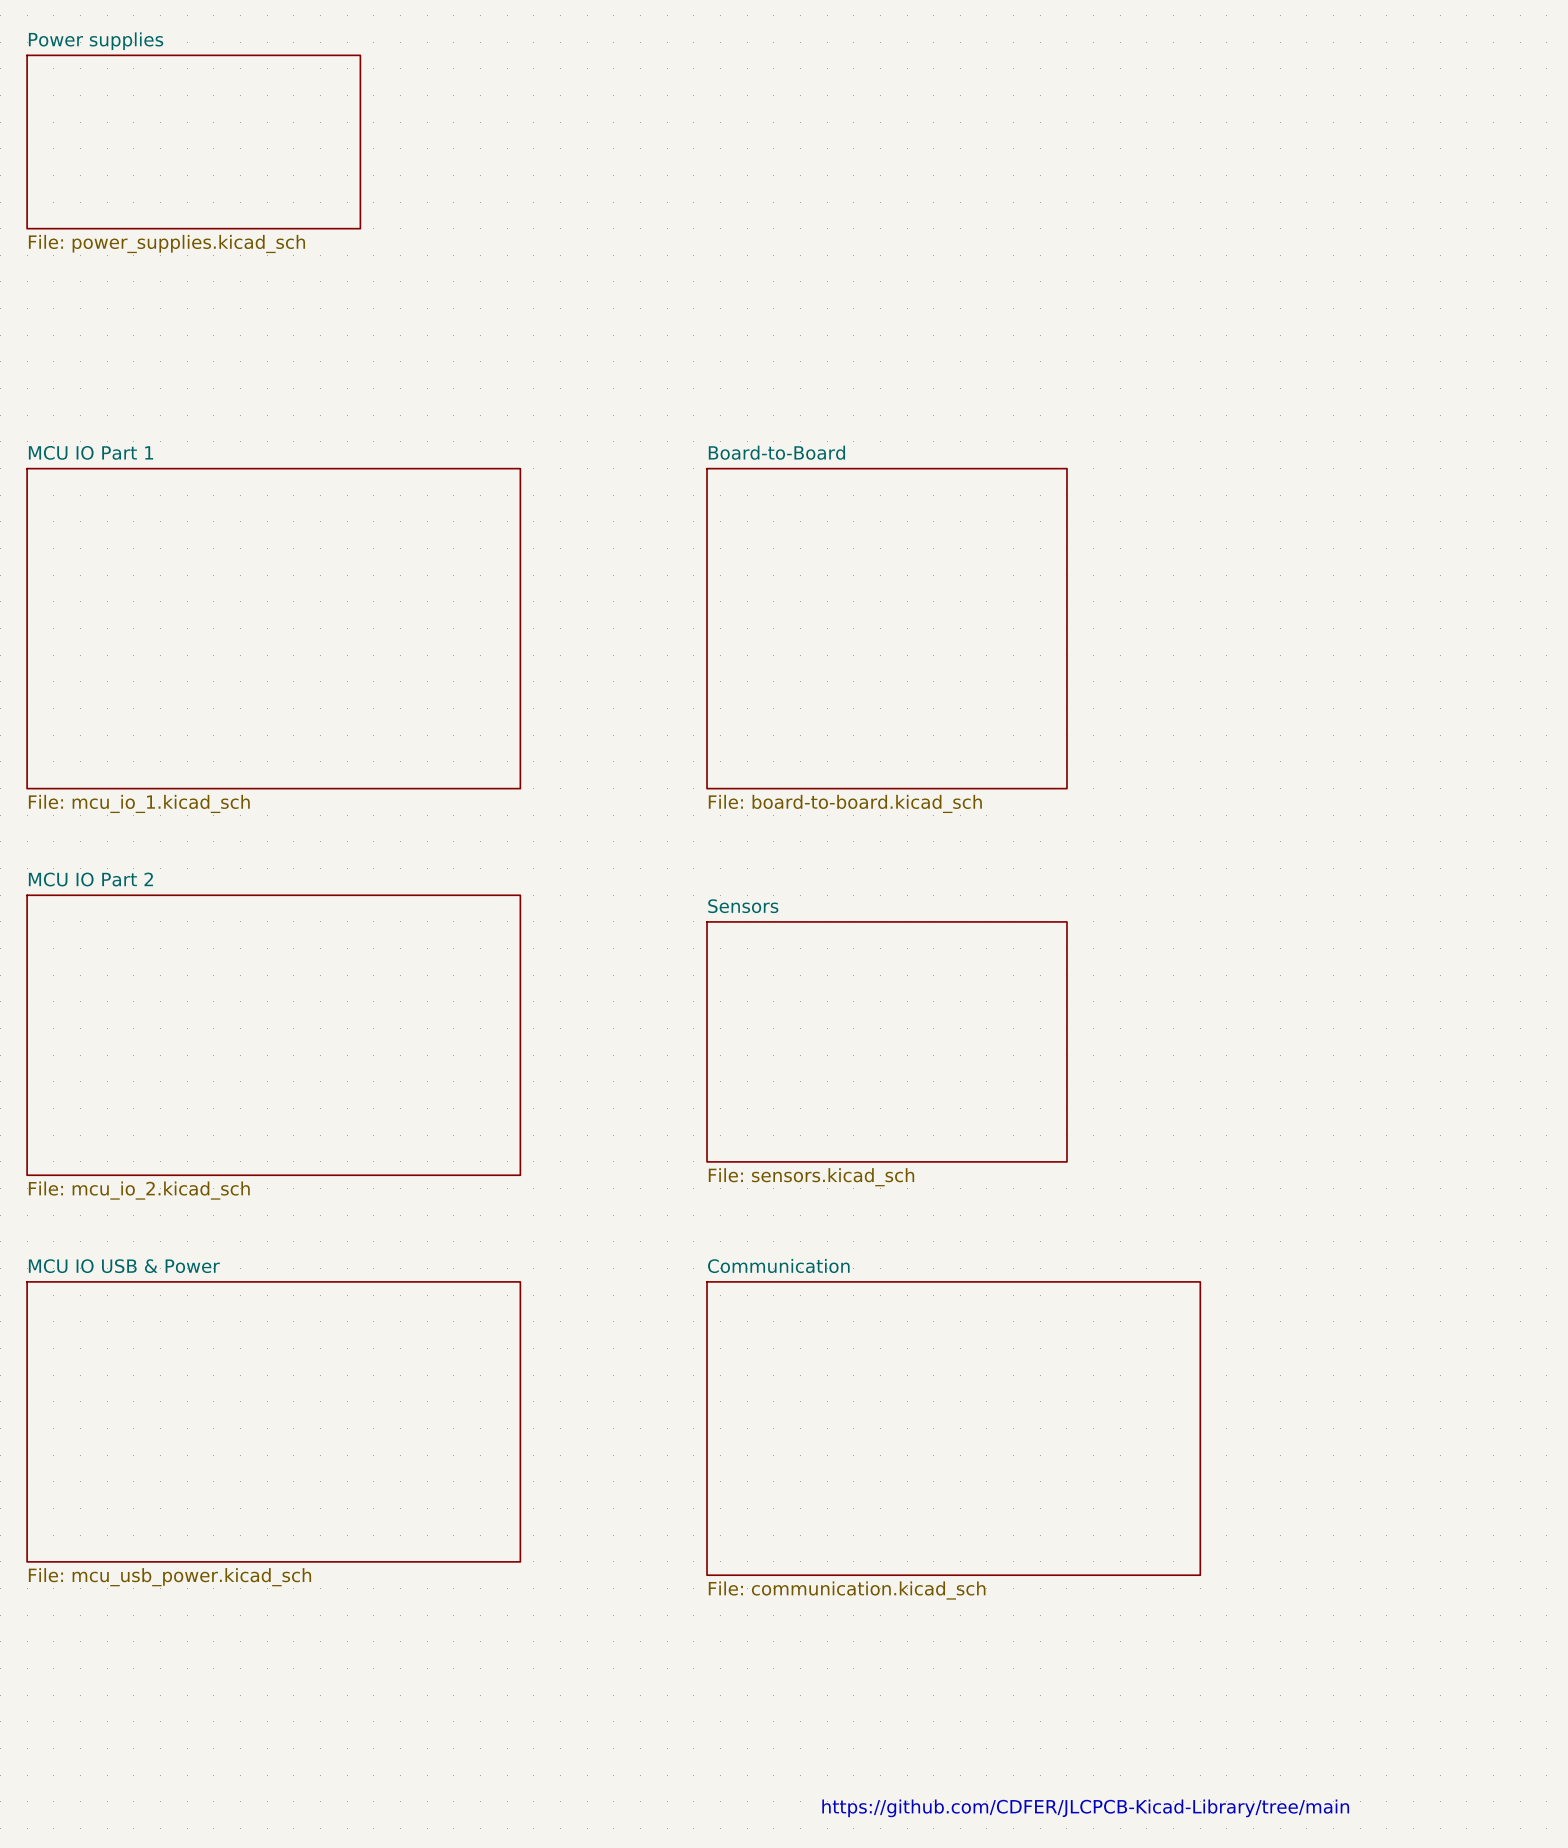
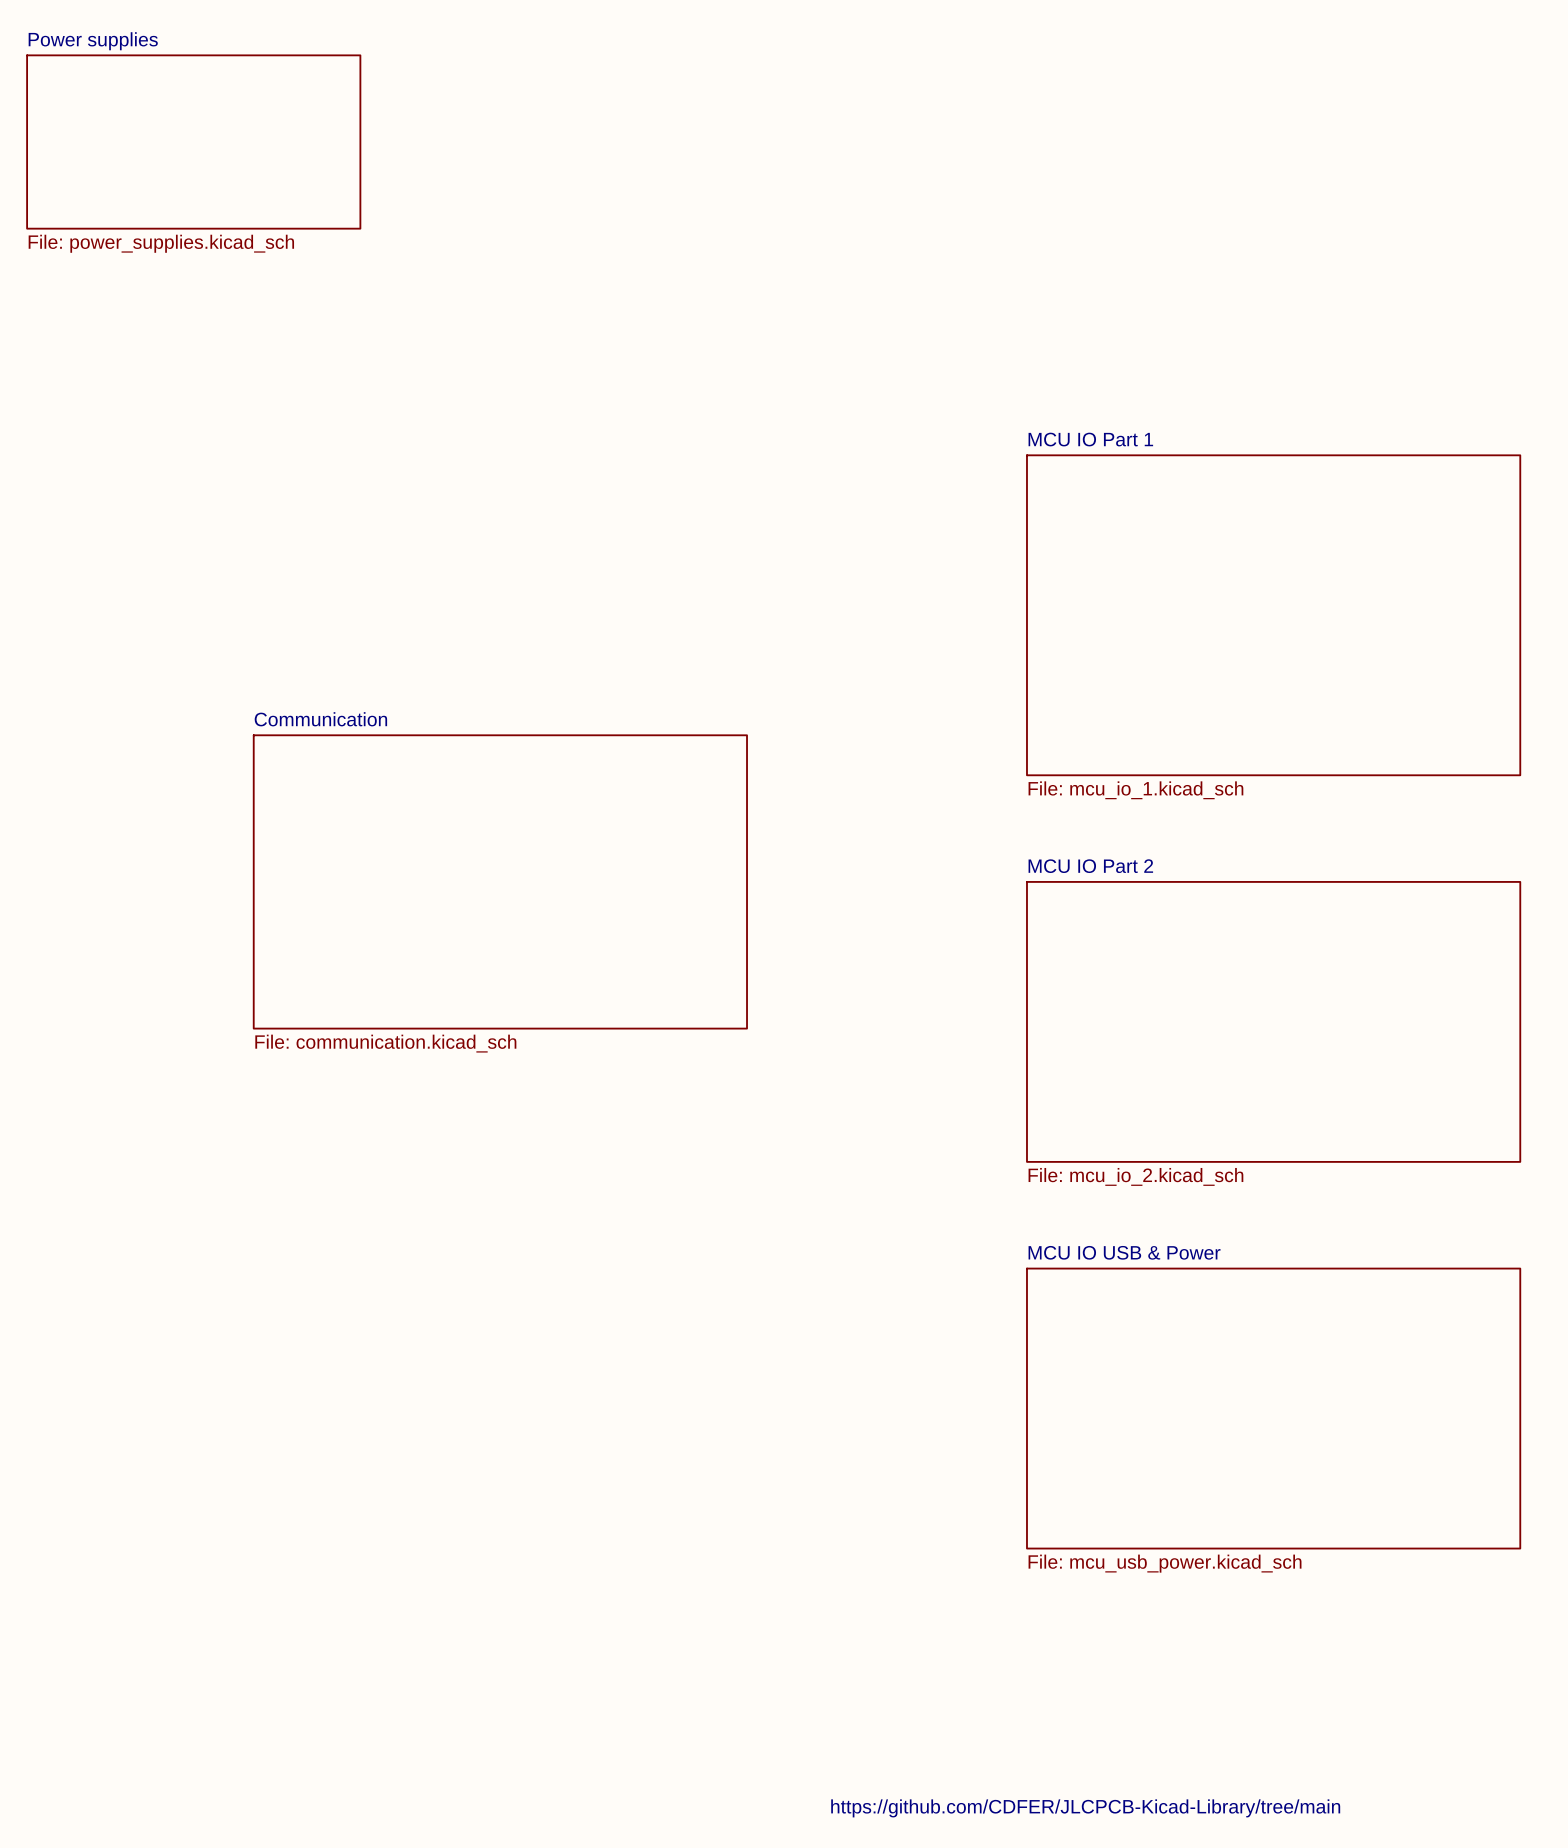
sheet MCU IO Part 1 position: (273, 628) -> (1273, 615)
sheet Board-to-Board: File: board-to-board.kicad_sch (887, 628) -> none
sheet Communication: none -> File: communication.kicad_sch (500, 881)
sheet MCU IO Part 2 position: (273, 1035) -> (1273, 1021)
sheet Sensors: File: sensors.kicad_sch (887, 1041) -> none
sheet MCU IO USB & Power: none -> File: mcu_usb_power.kicad_sch (1273, 1408)
sheet MCU IO USB & Power: File: mcu_usb_power.kicad_sch (273, 1421) -> none
sheet Communication: File: communication.kicad_sch (953, 1428) -> none

